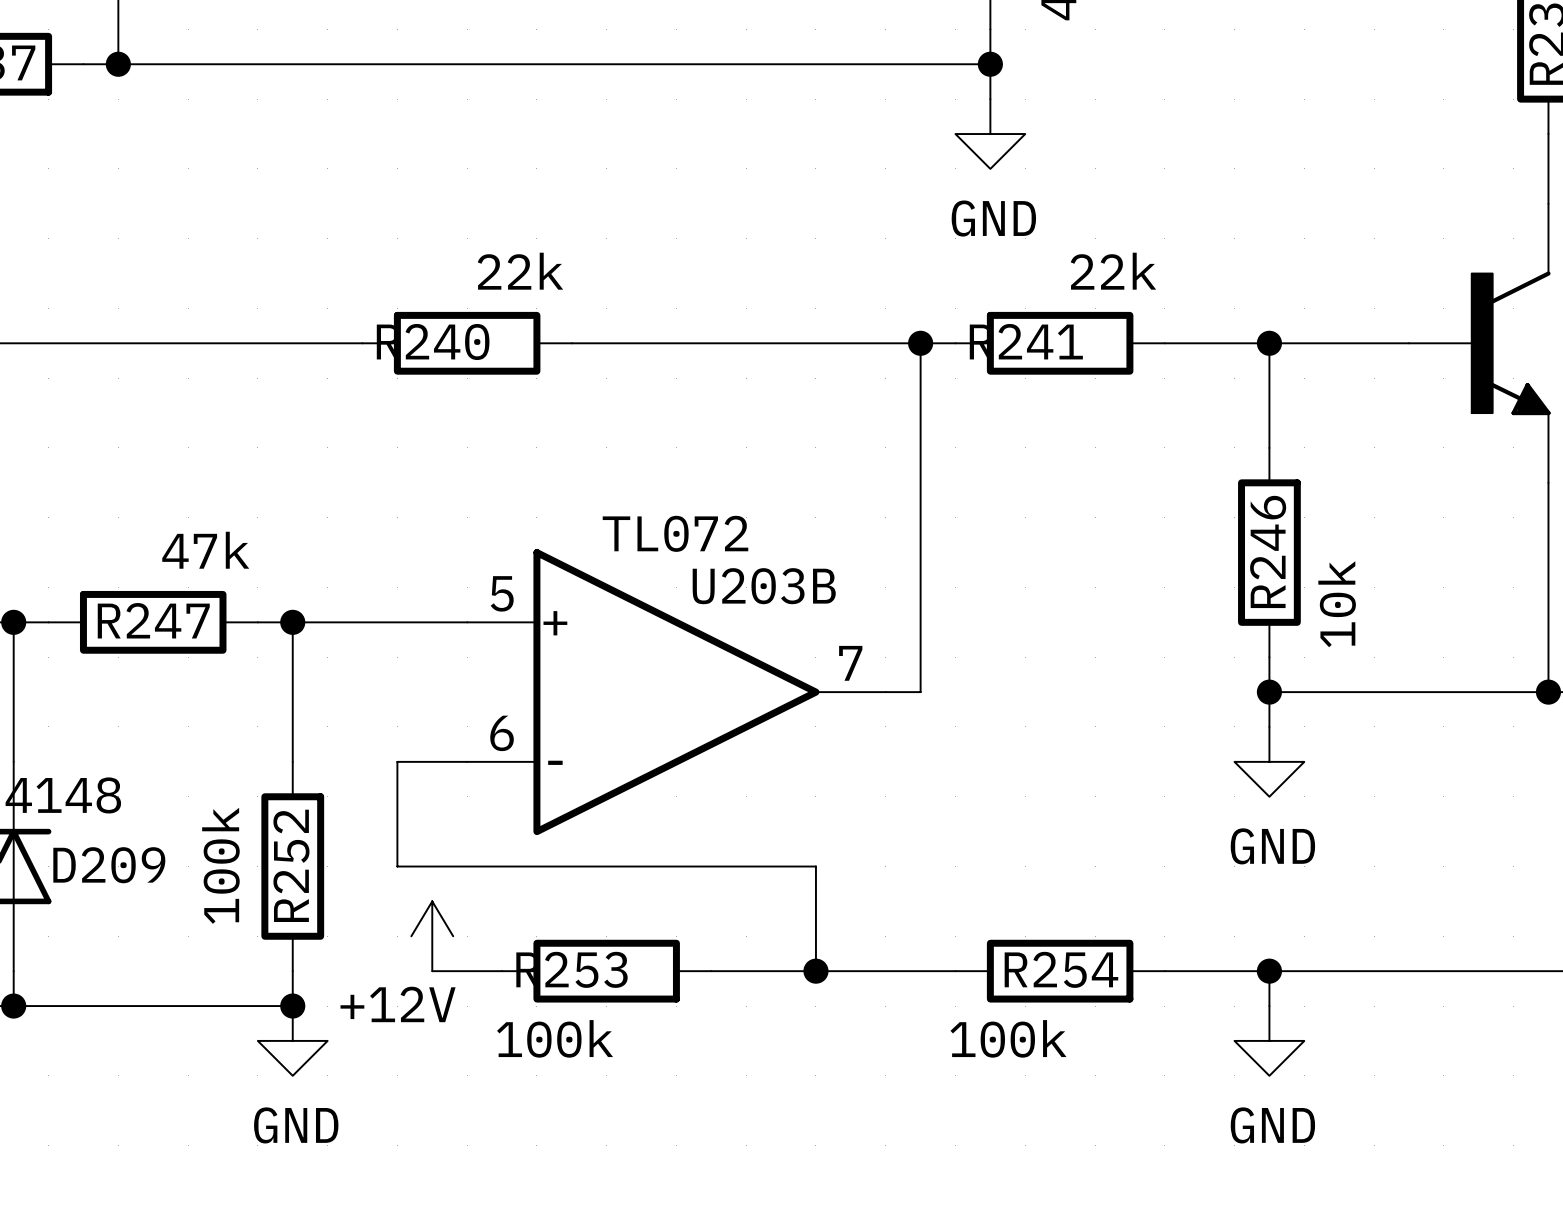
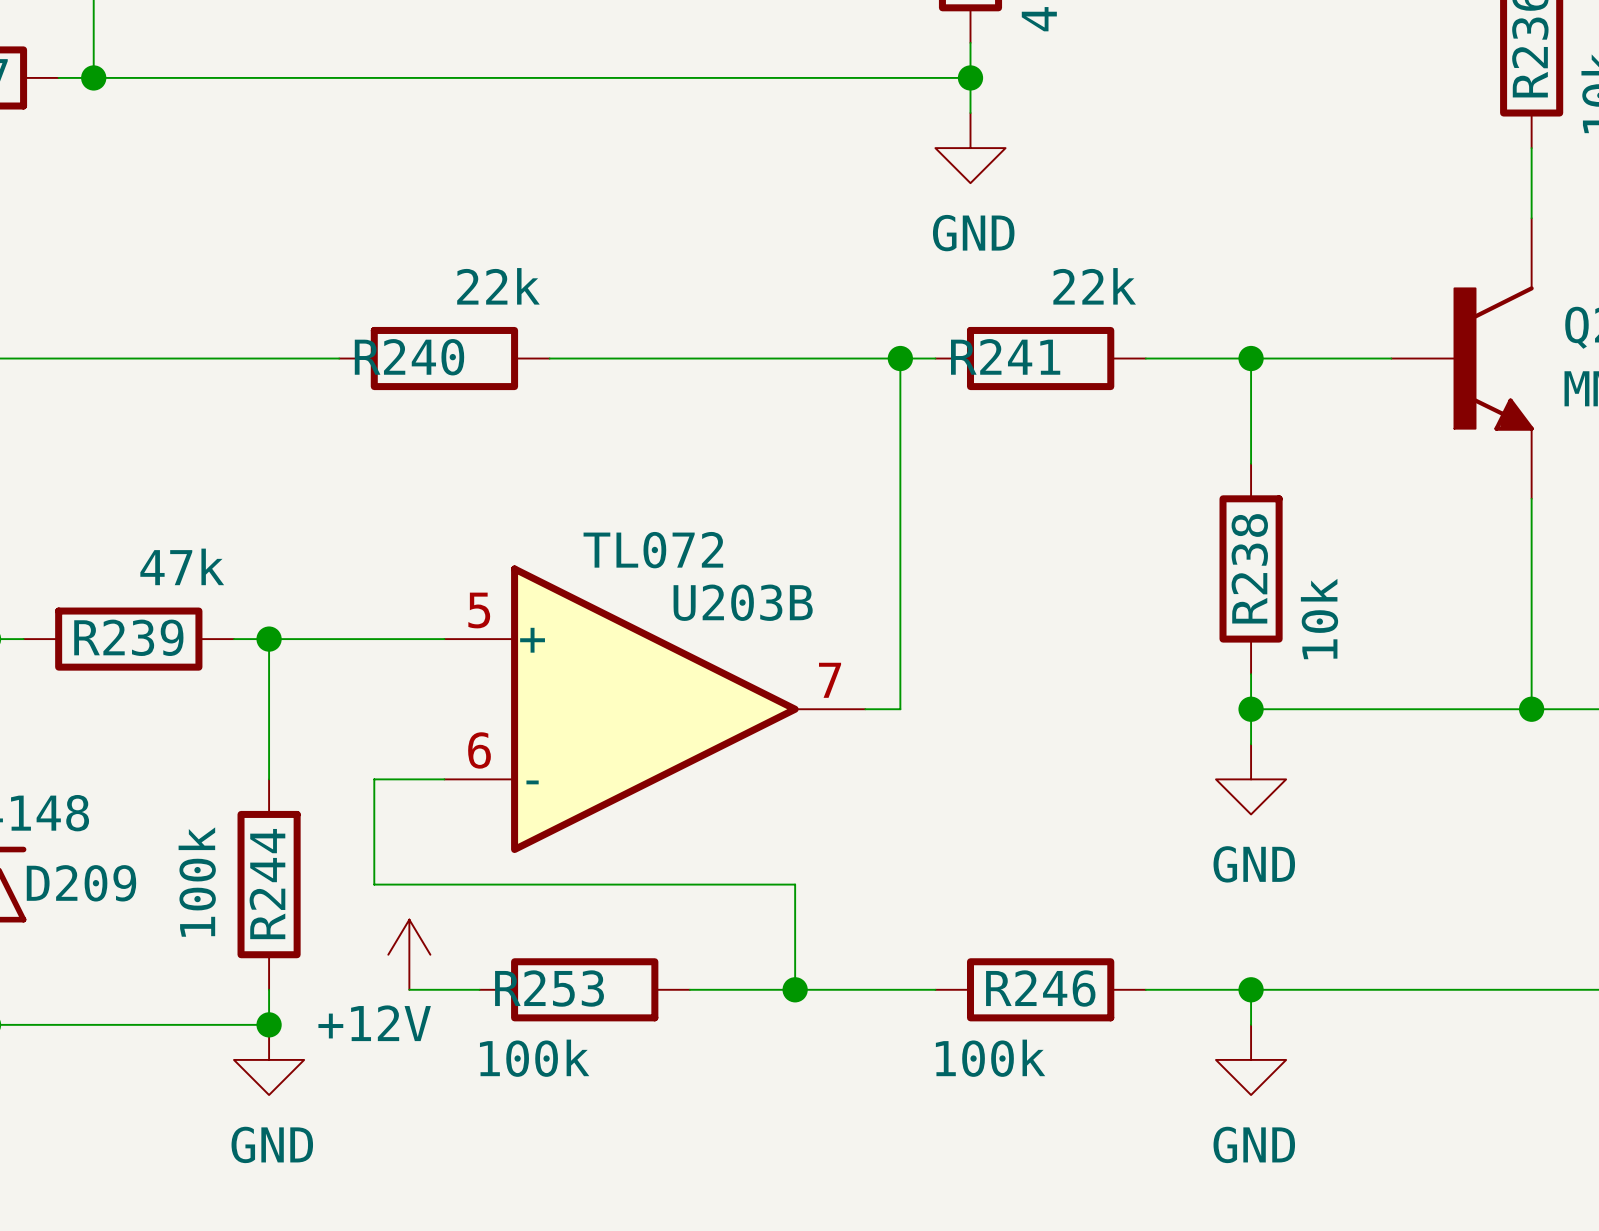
R246 name: R246 (1268, 551) -> R238 (1249, 568)
R247 name: R247 (153, 620) -> R239 (128, 637)
R252 name: R252 (291, 865) -> R244 (267, 884)
R254 name: R254 (1061, 969) -> R246 (1040, 988)

